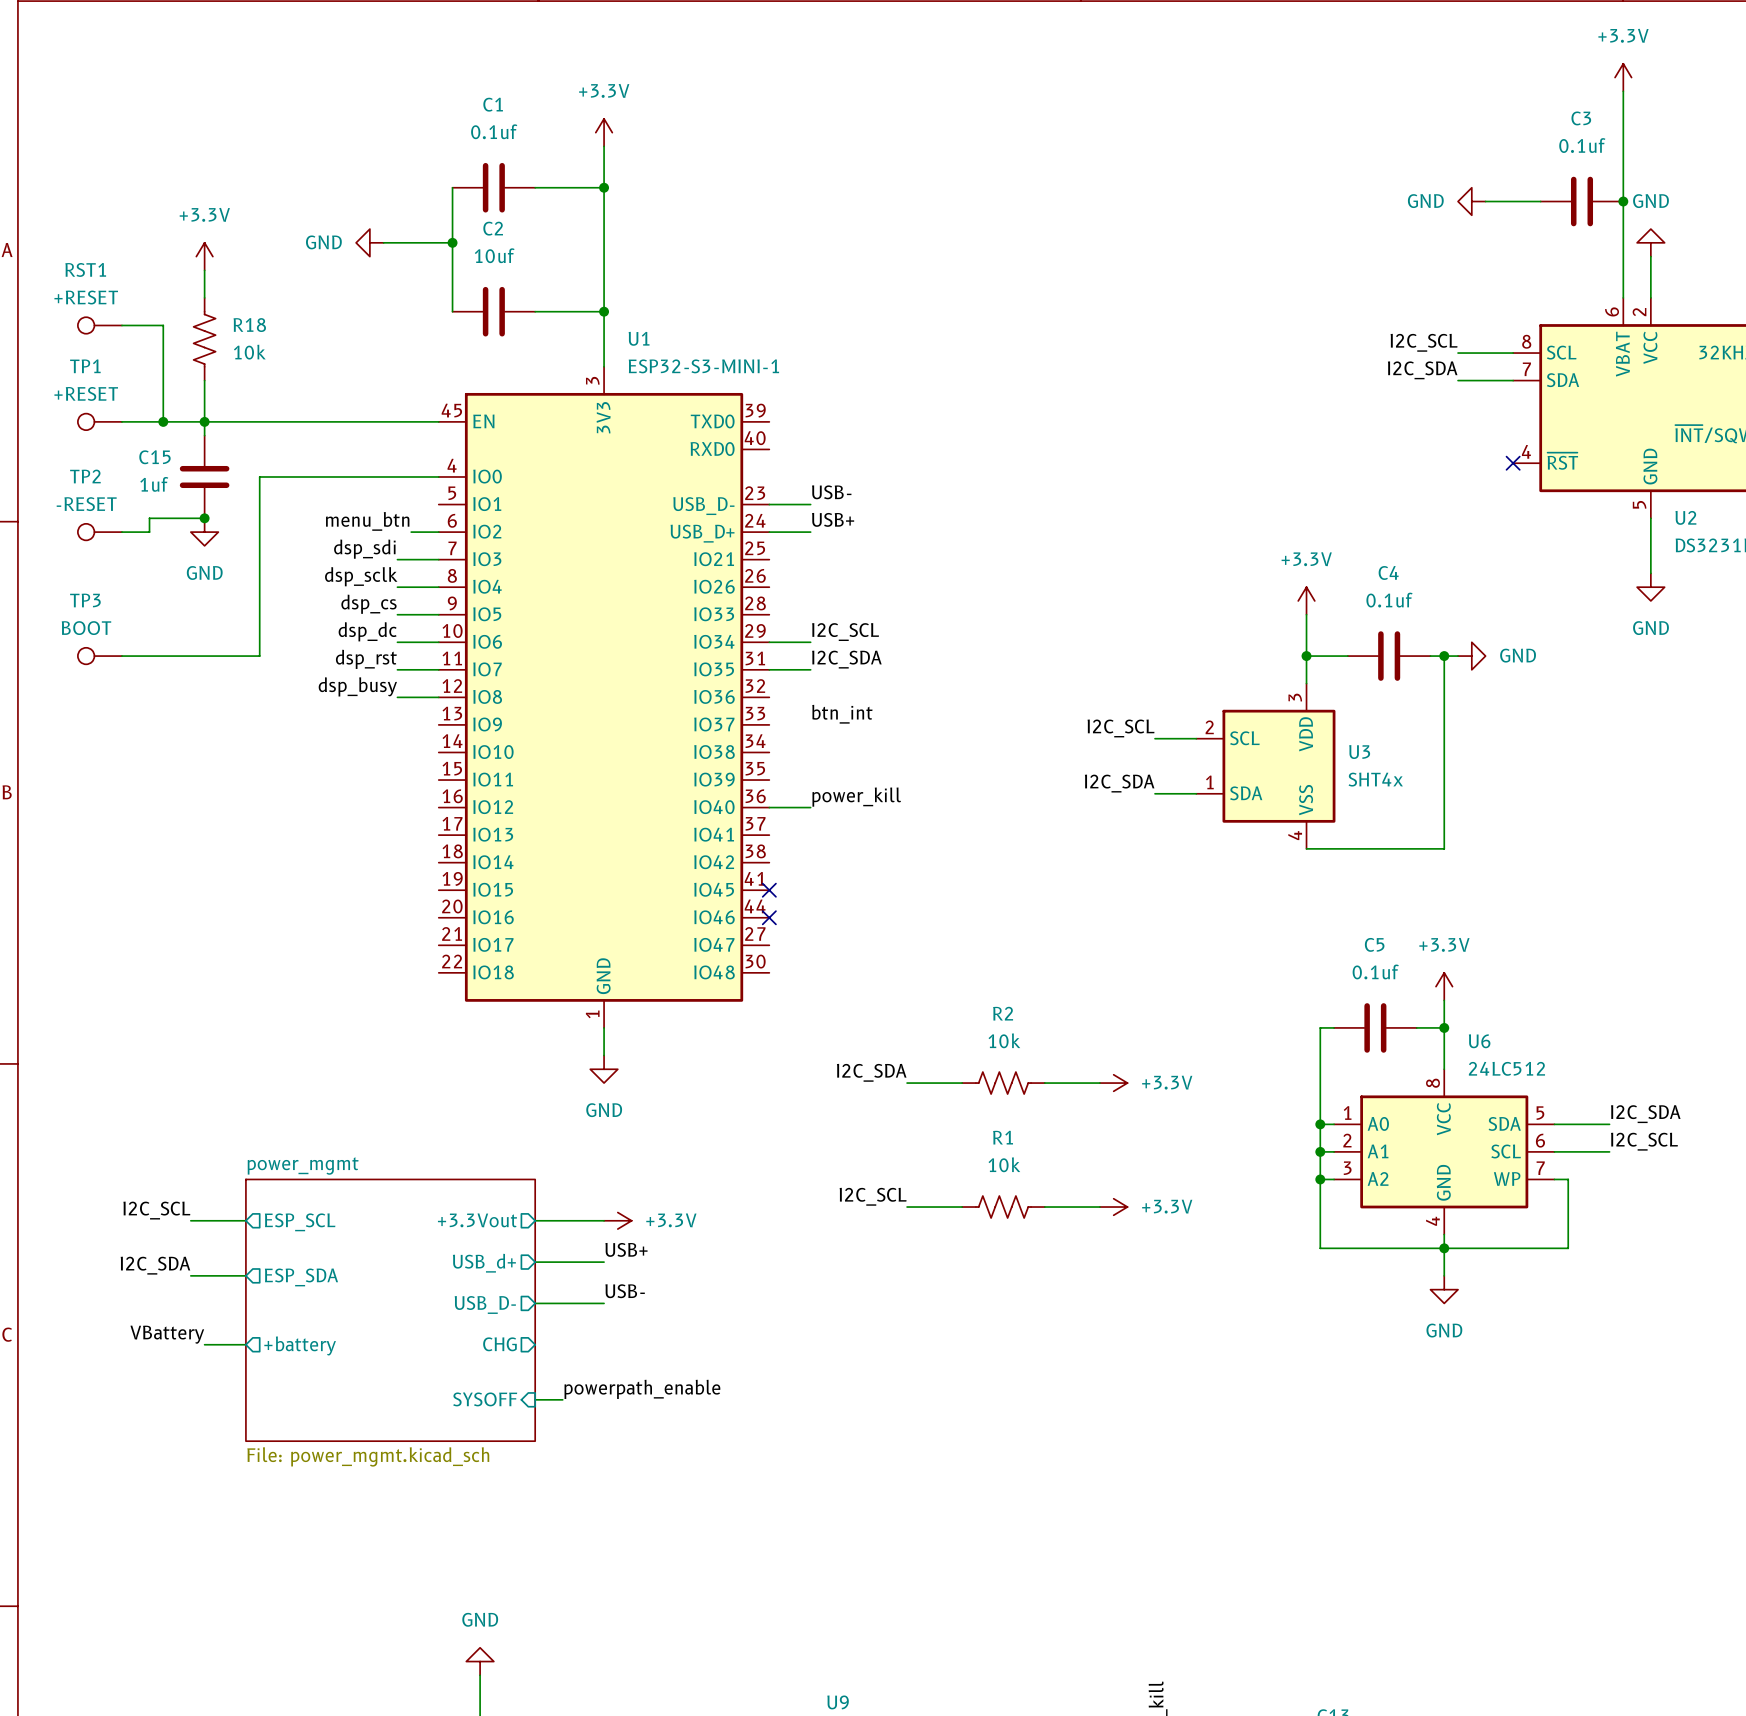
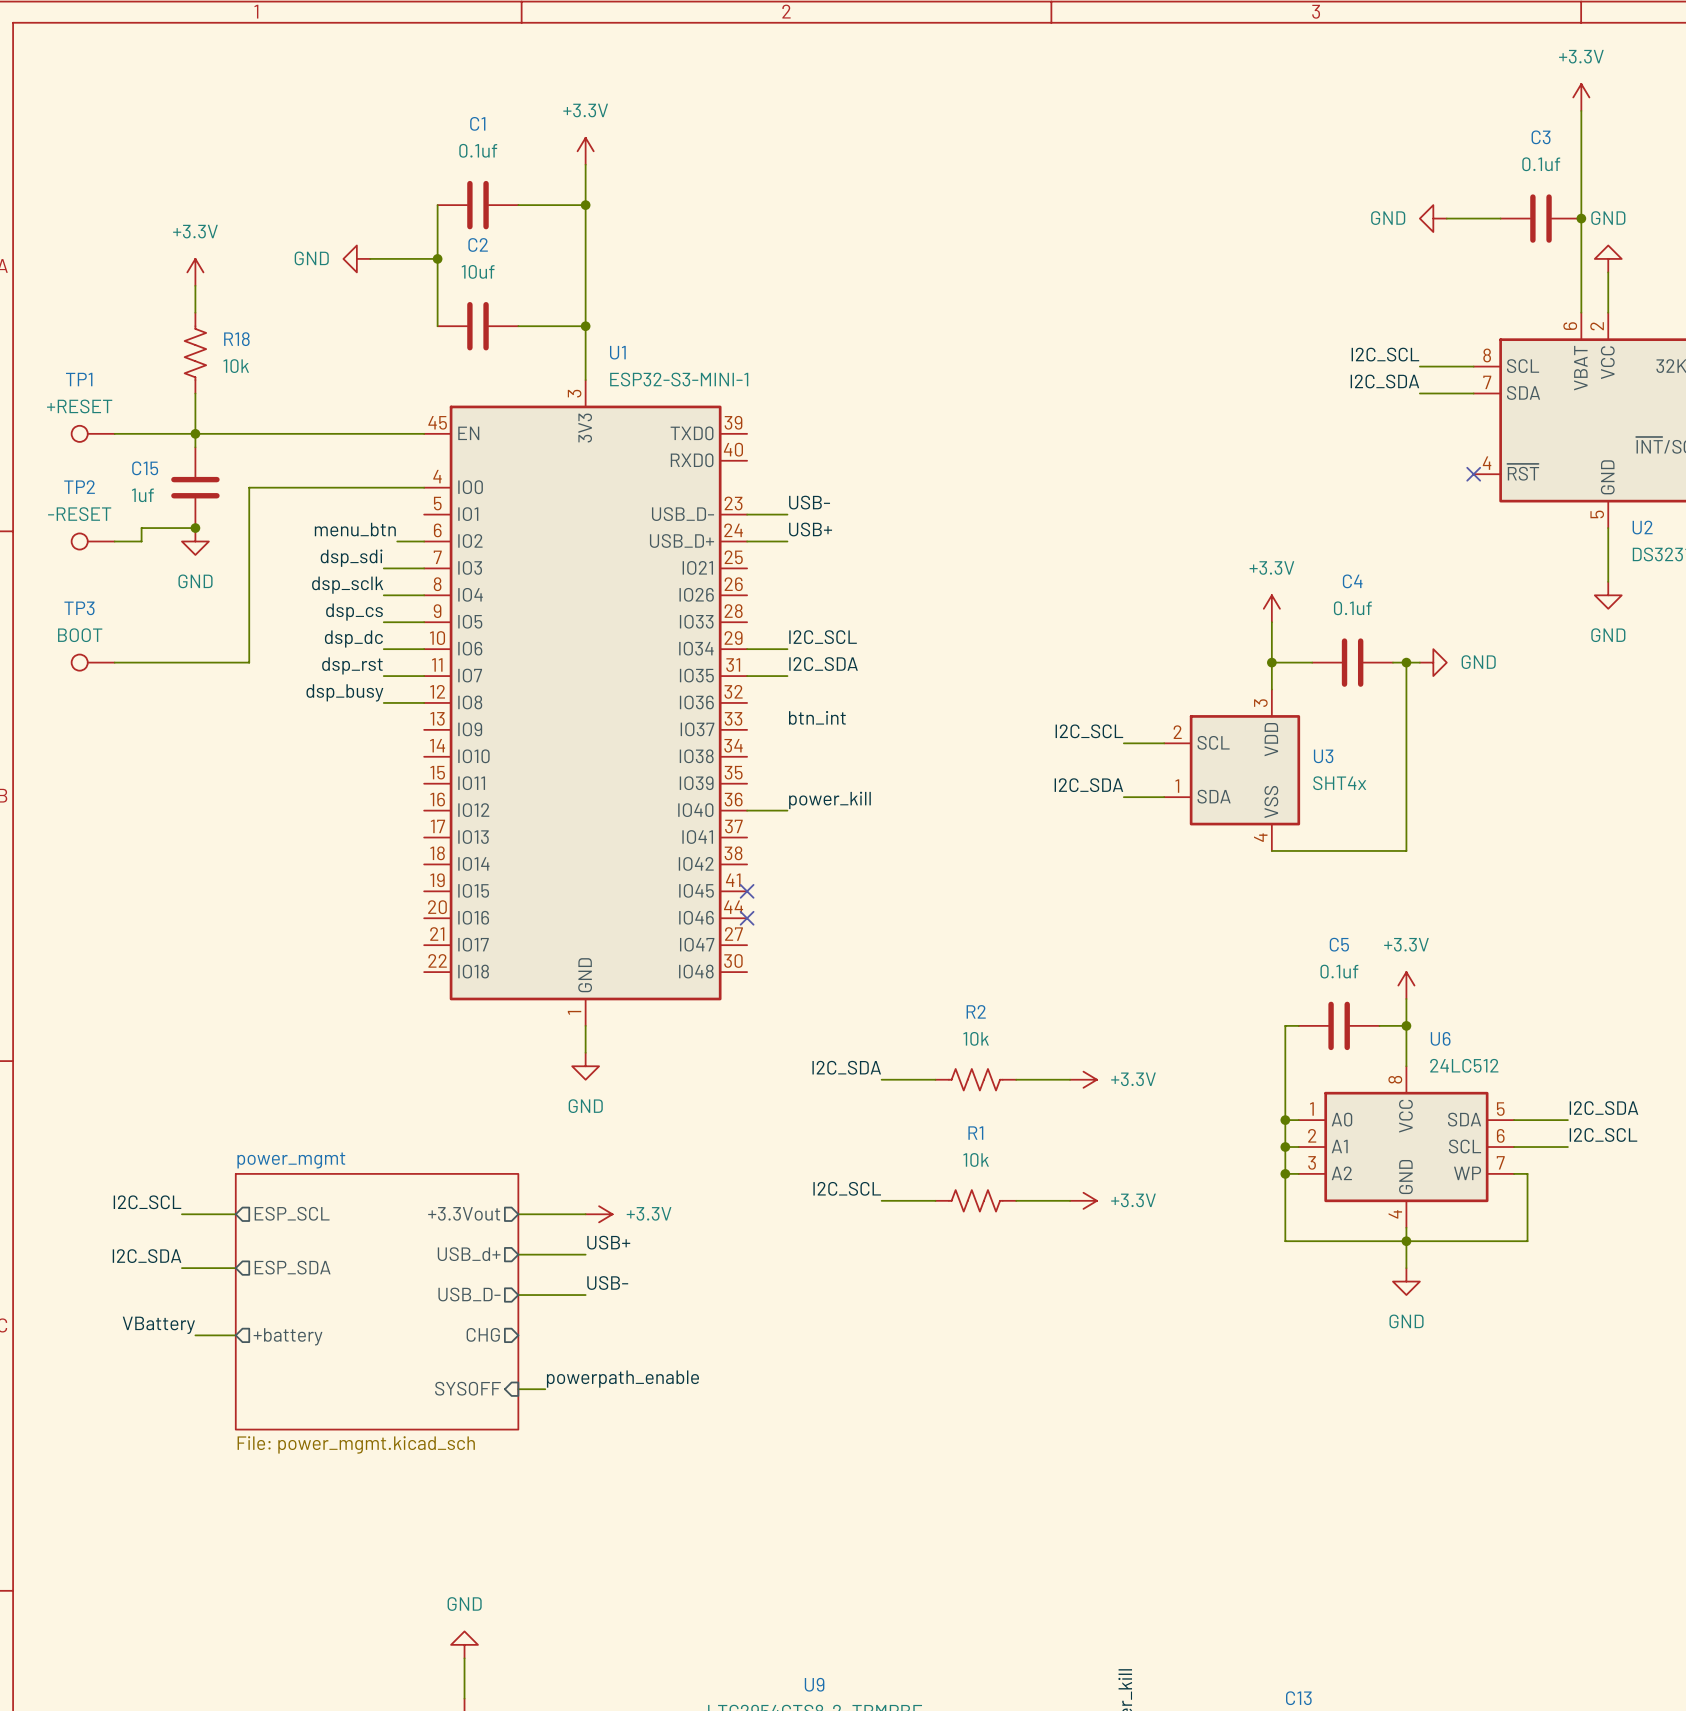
RST1: +RESET (99, 325) -> none
wire: (121, 325) (163, 325) (163, 421) -> none
junction: (163, 421) -> none

